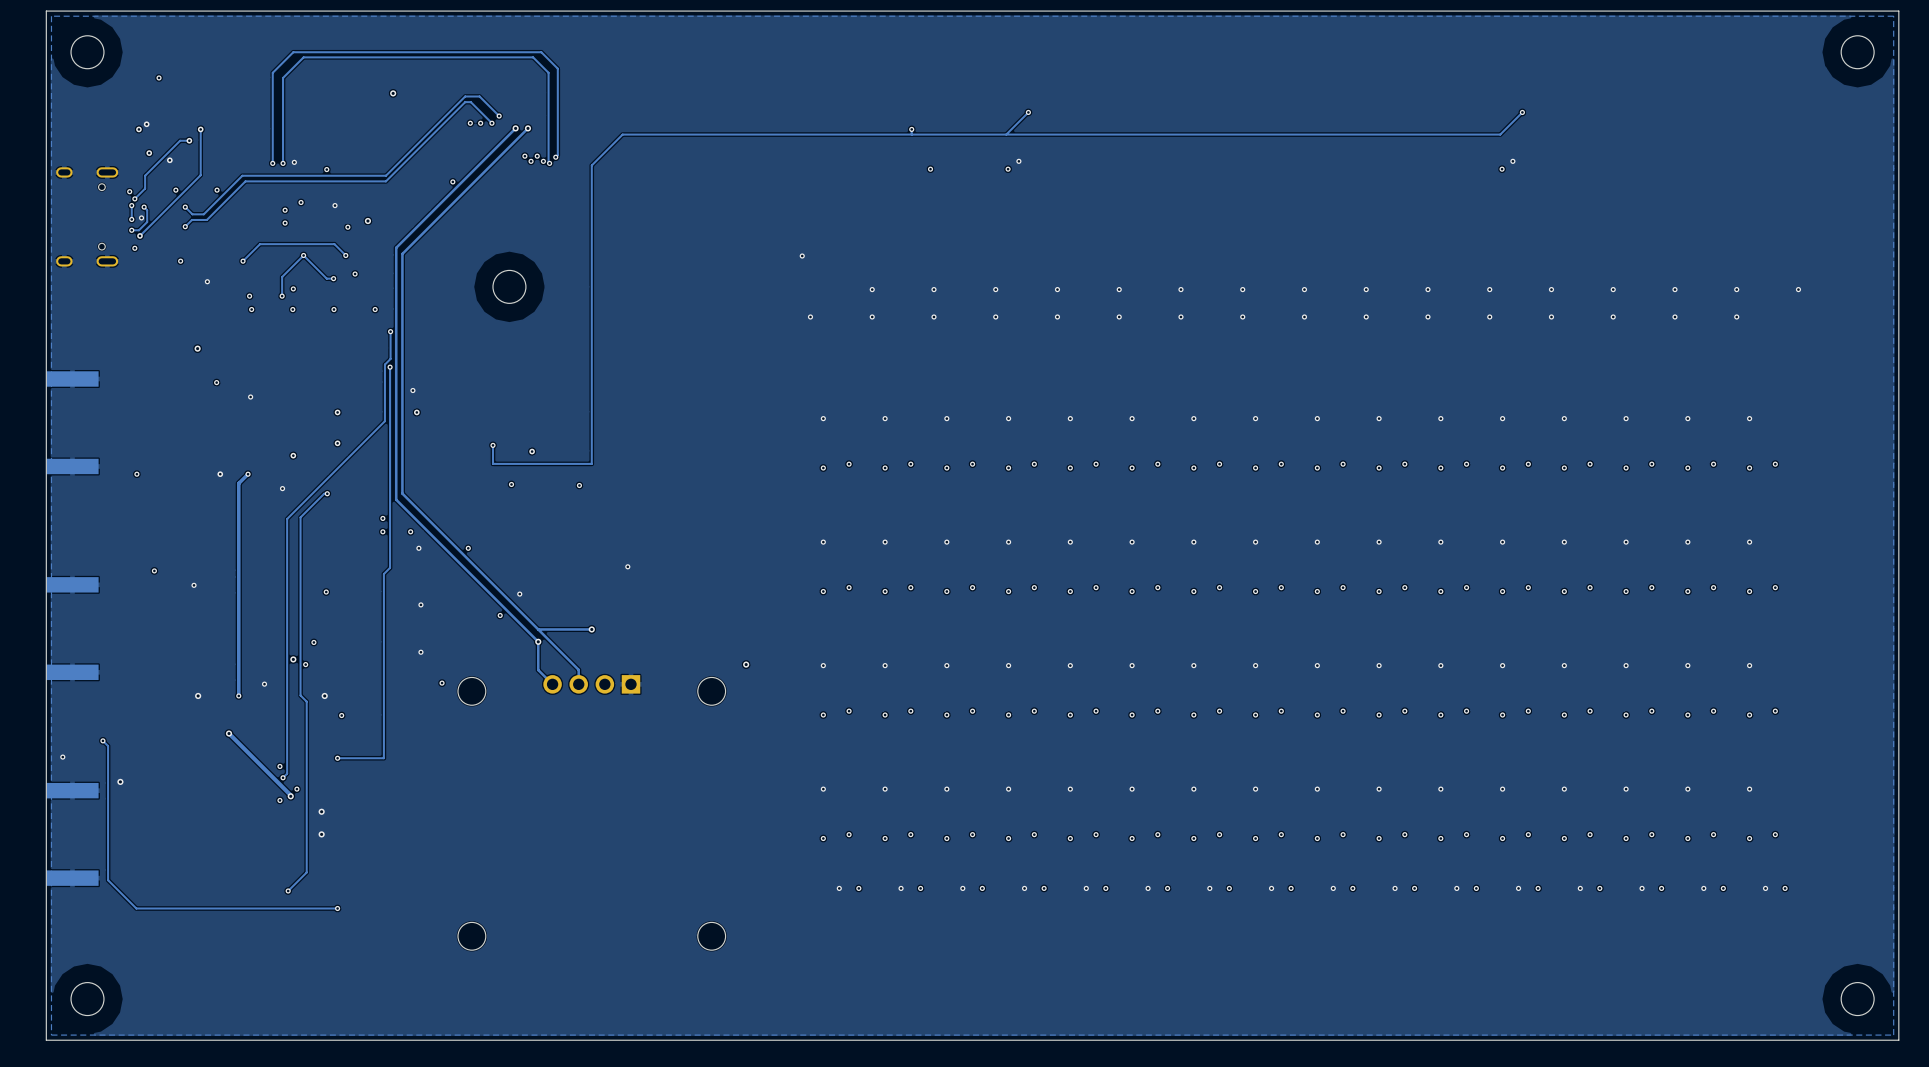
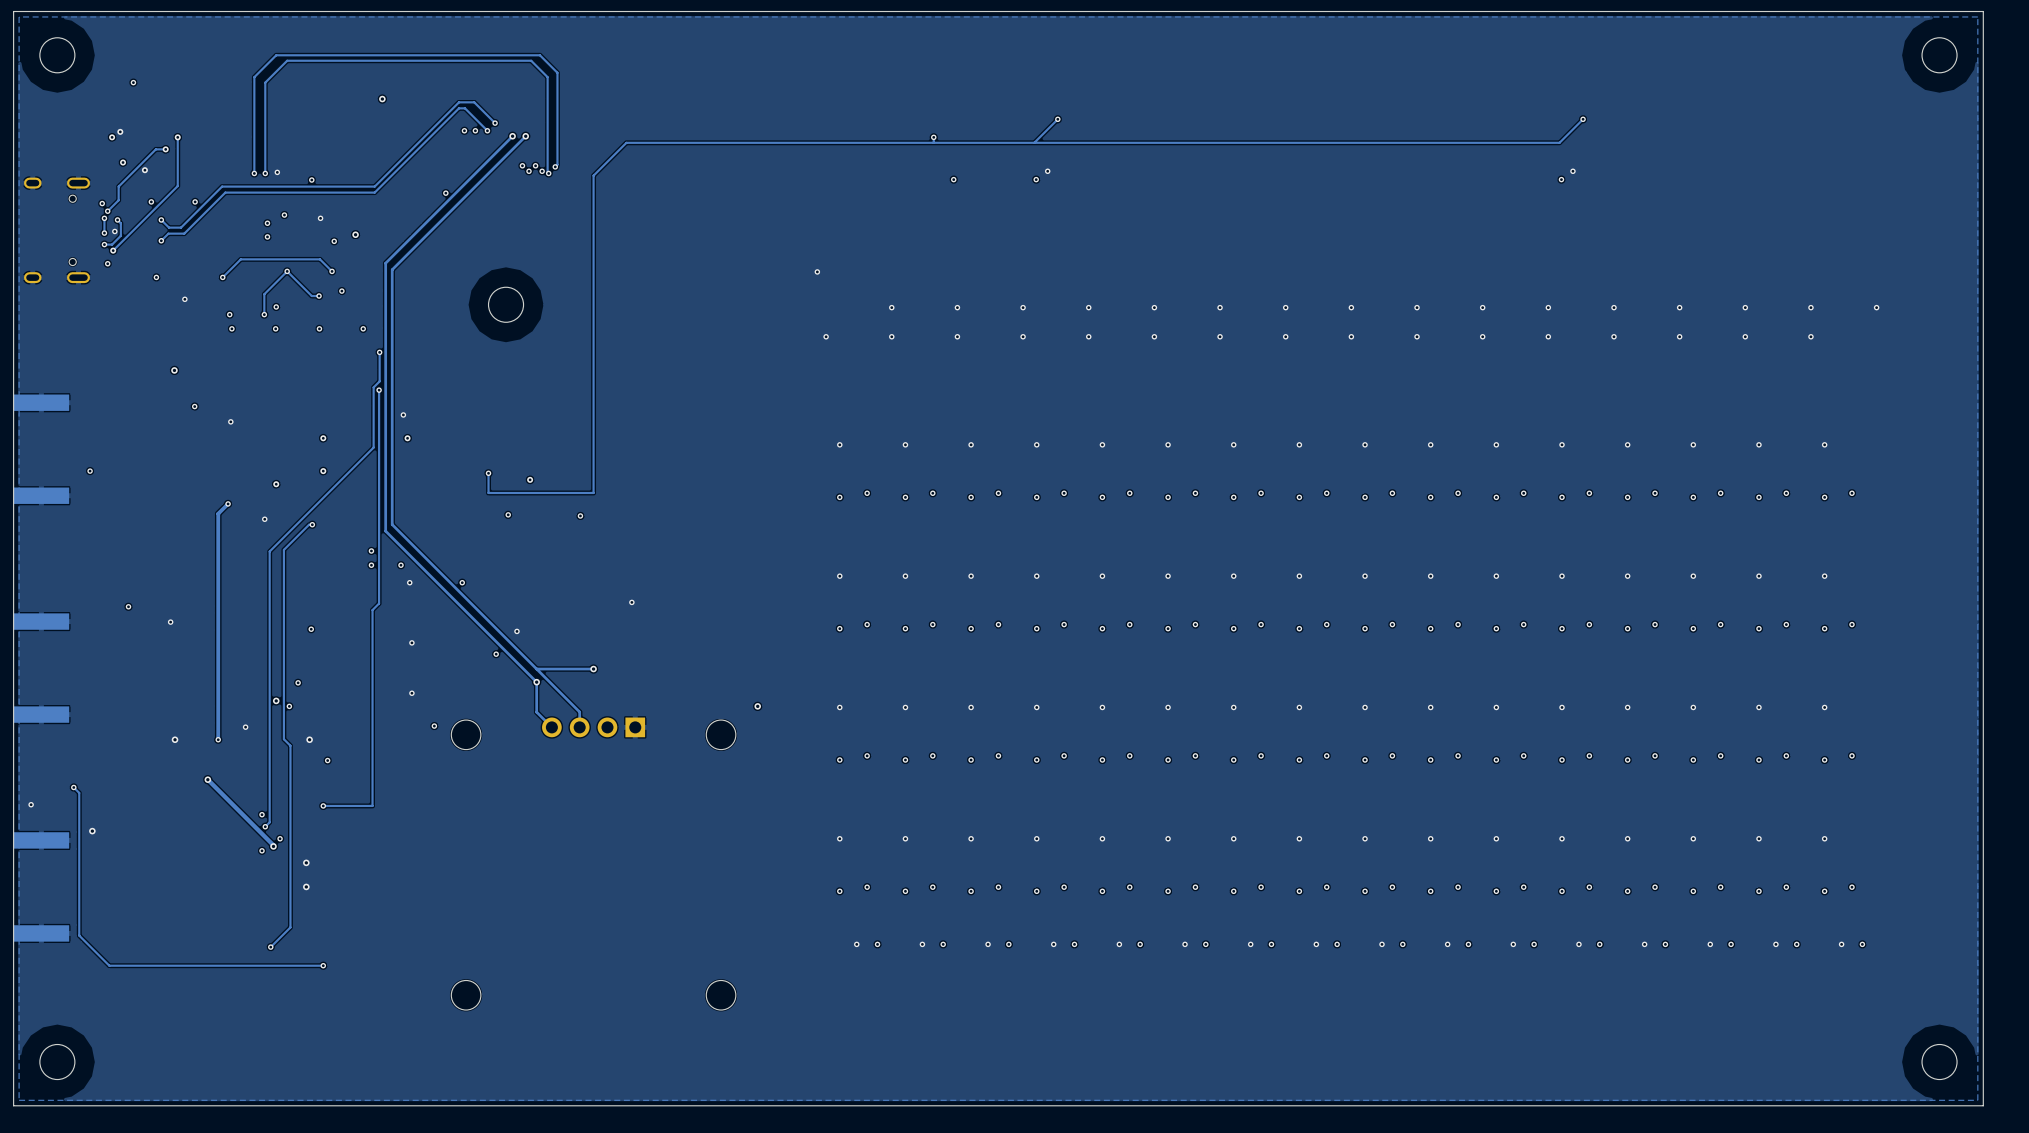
via position: (136, 474) -> (90, 471)
via: (220, 474) -> none

